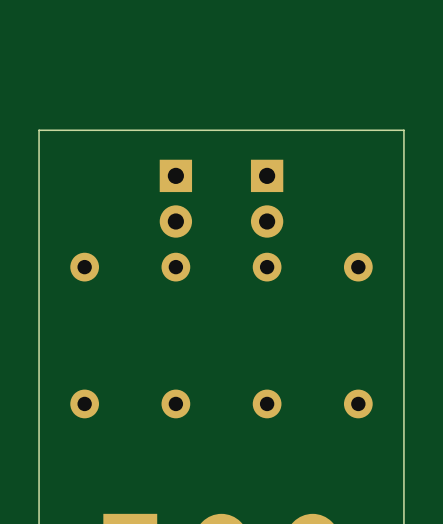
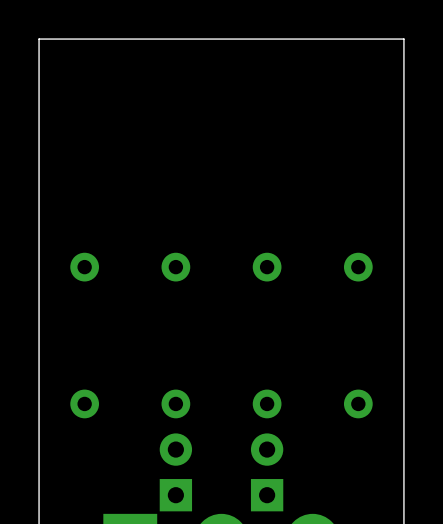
board edge: (403, 130) (39, 130) -> (403, 130) (403, 39) (39, 39) (39, 130)
part: (175, 198) -> none
part: (267, 198) -> none
part: none -> (175, 472)
part: none -> (267, 472)

